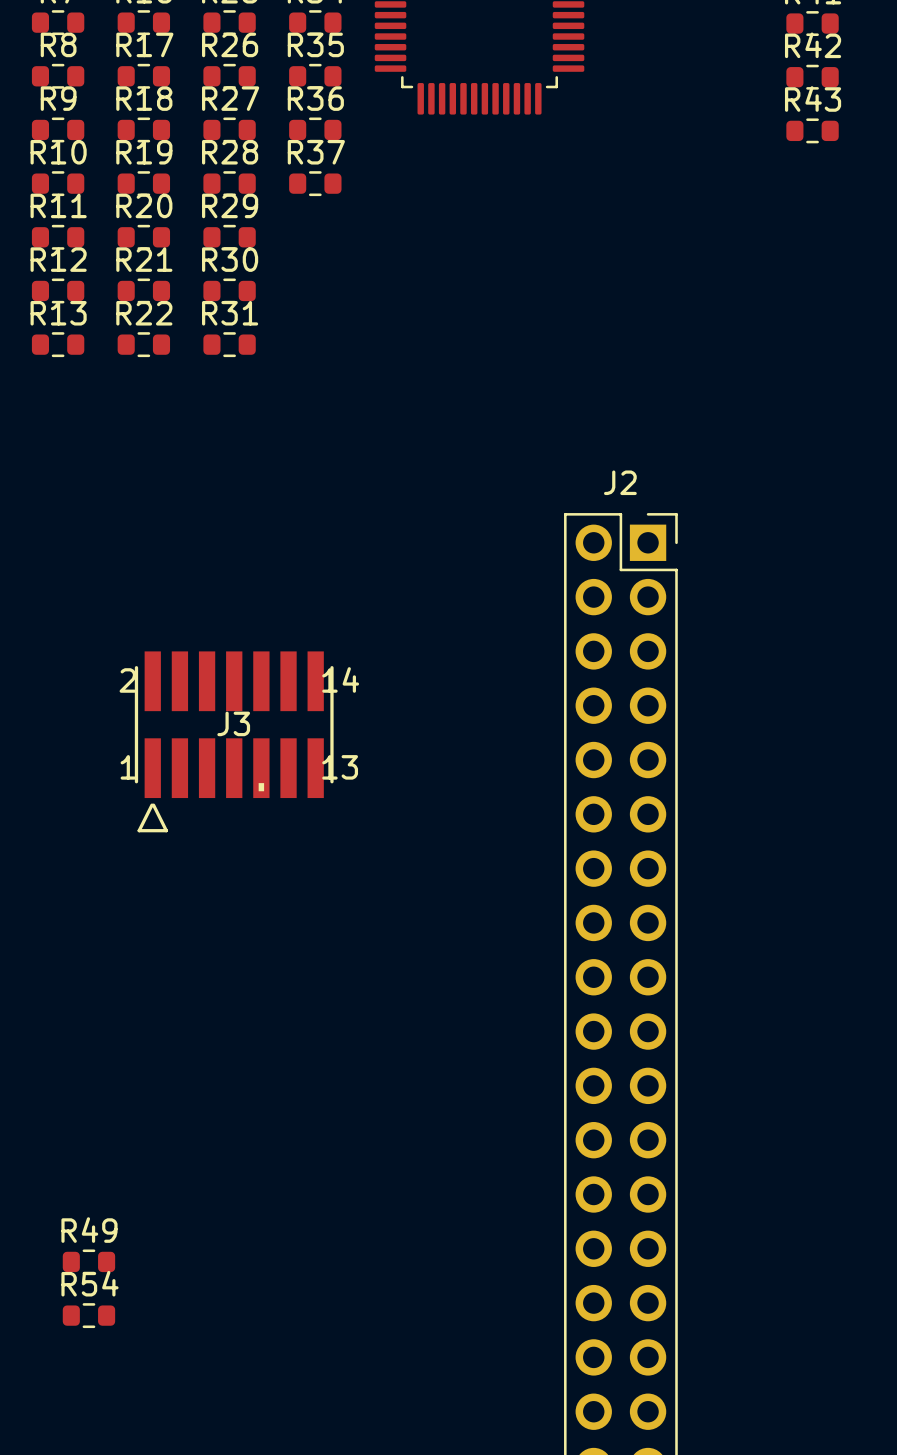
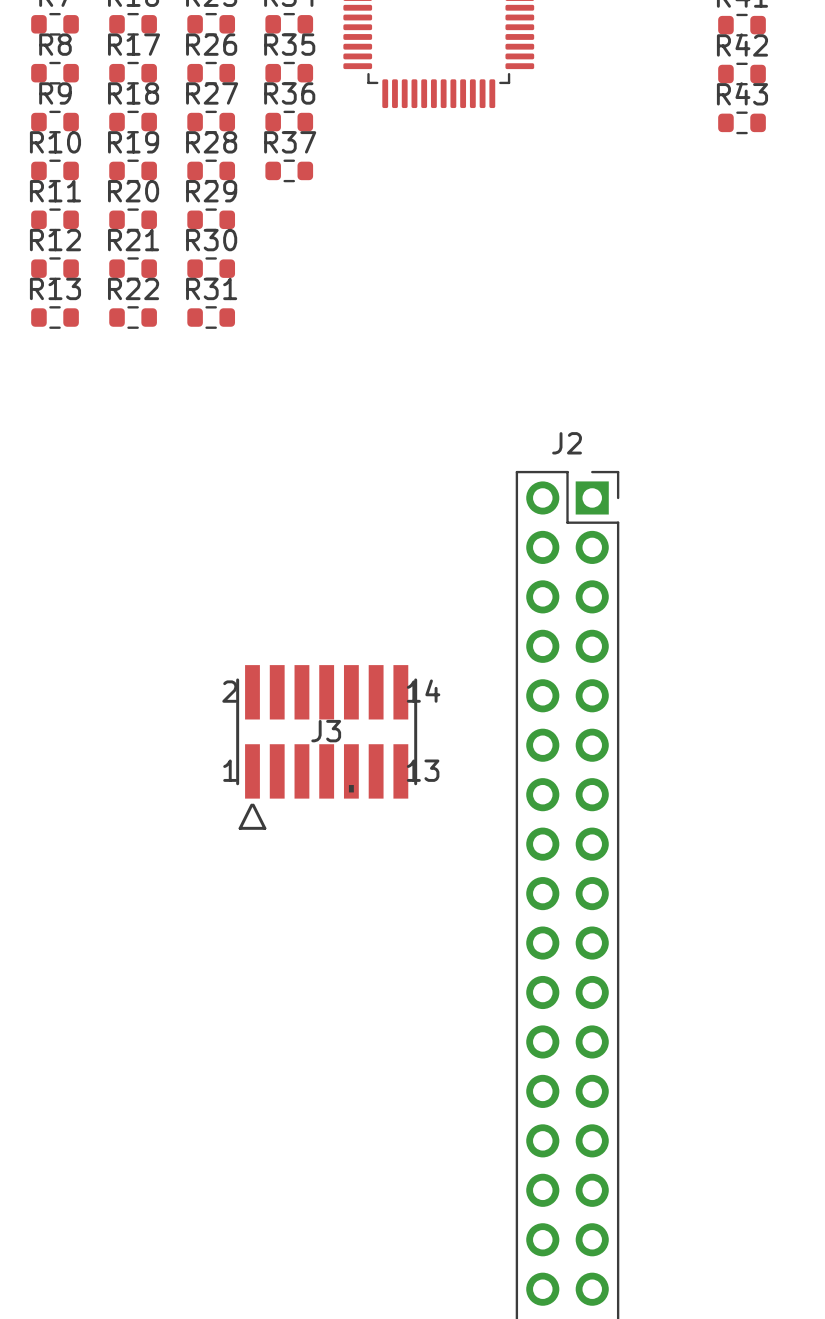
J3 position: (234, 741) -> (326, 747)
R49: (88, 1261) -> none
R54: (88, 1315) -> none

